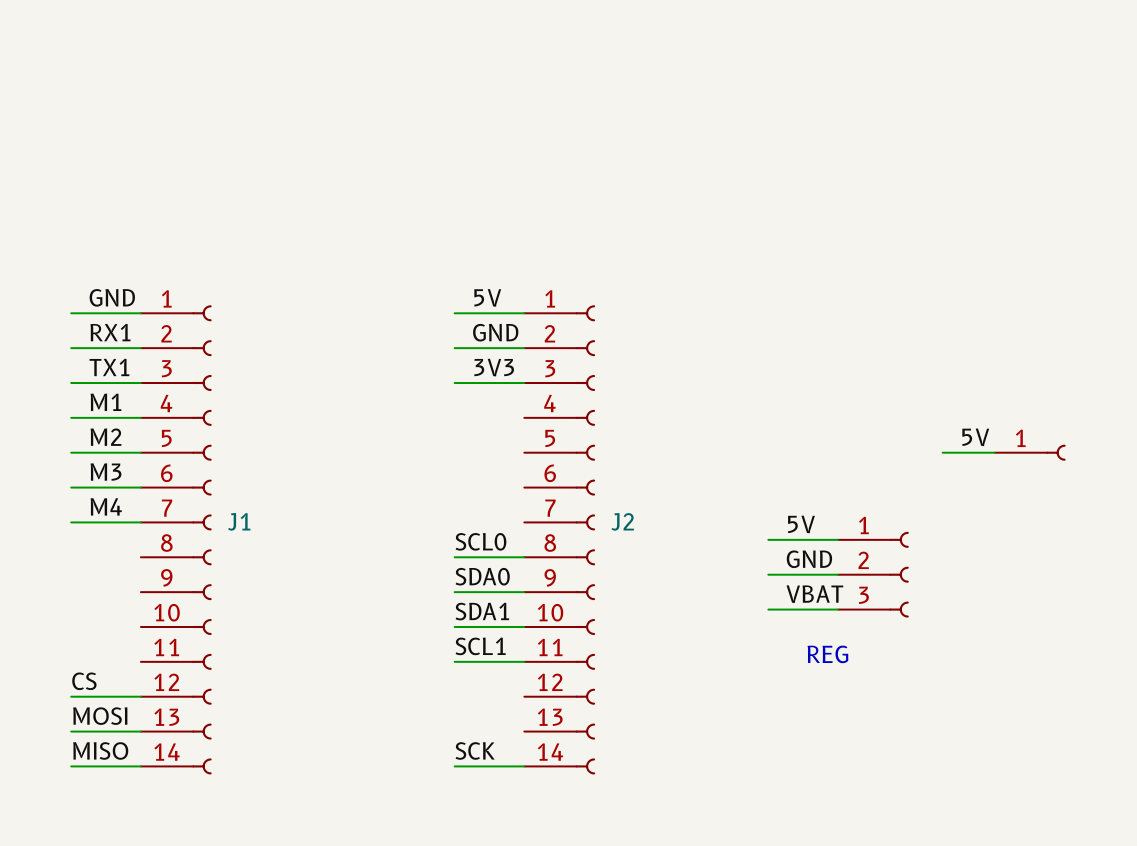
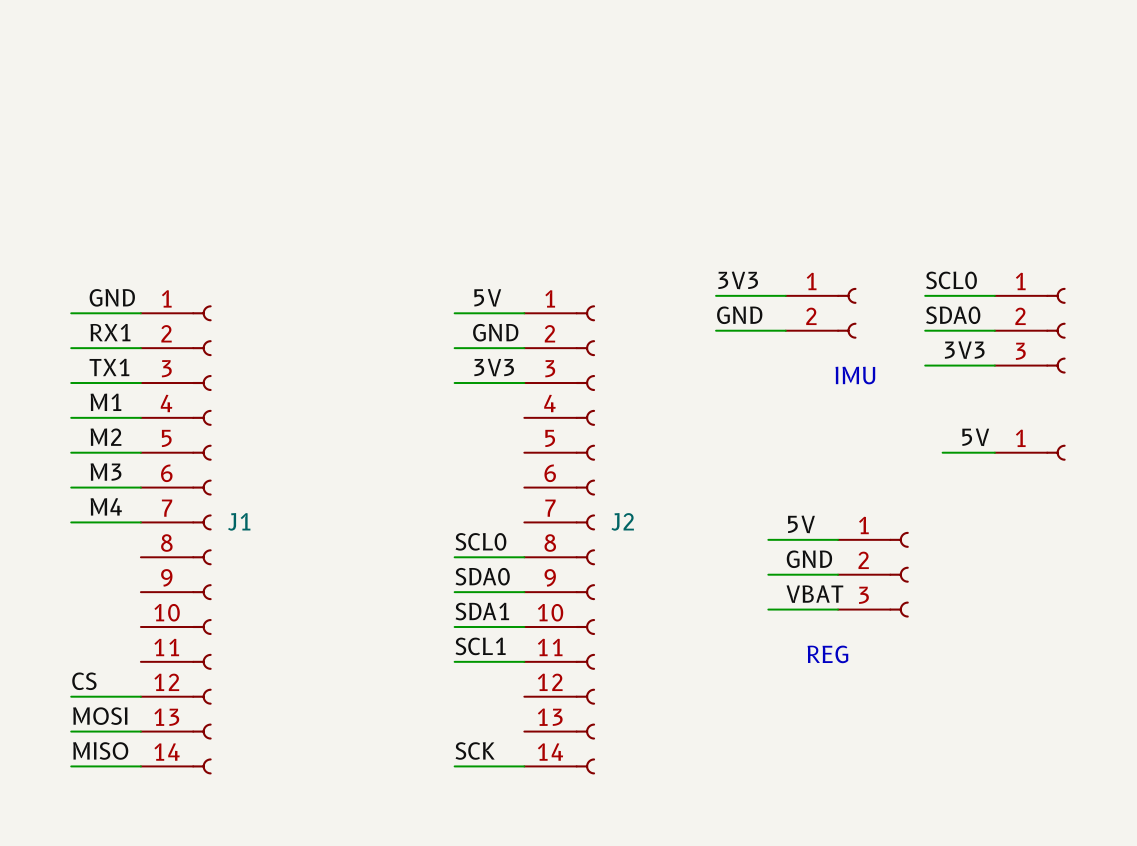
label: none -> 3V3 (738, 280)
label: none -> SCL0 (951, 280)
wire: none -> (716, 295) (785, 295)
wire: none -> (925, 295) (994, 295)
part: none -> (821, 313)
label: none -> GND (739, 315)
label: none -> SDA0 (953, 315)
wire: none -> (716, 330) (785, 330)
wire: none -> (925, 330) (994, 330)
part: none -> (1030, 330)
label: none -> 3V3 (964, 350)
wire: none -> (925, 365) (994, 365)
text: none -> IMU (855, 375)

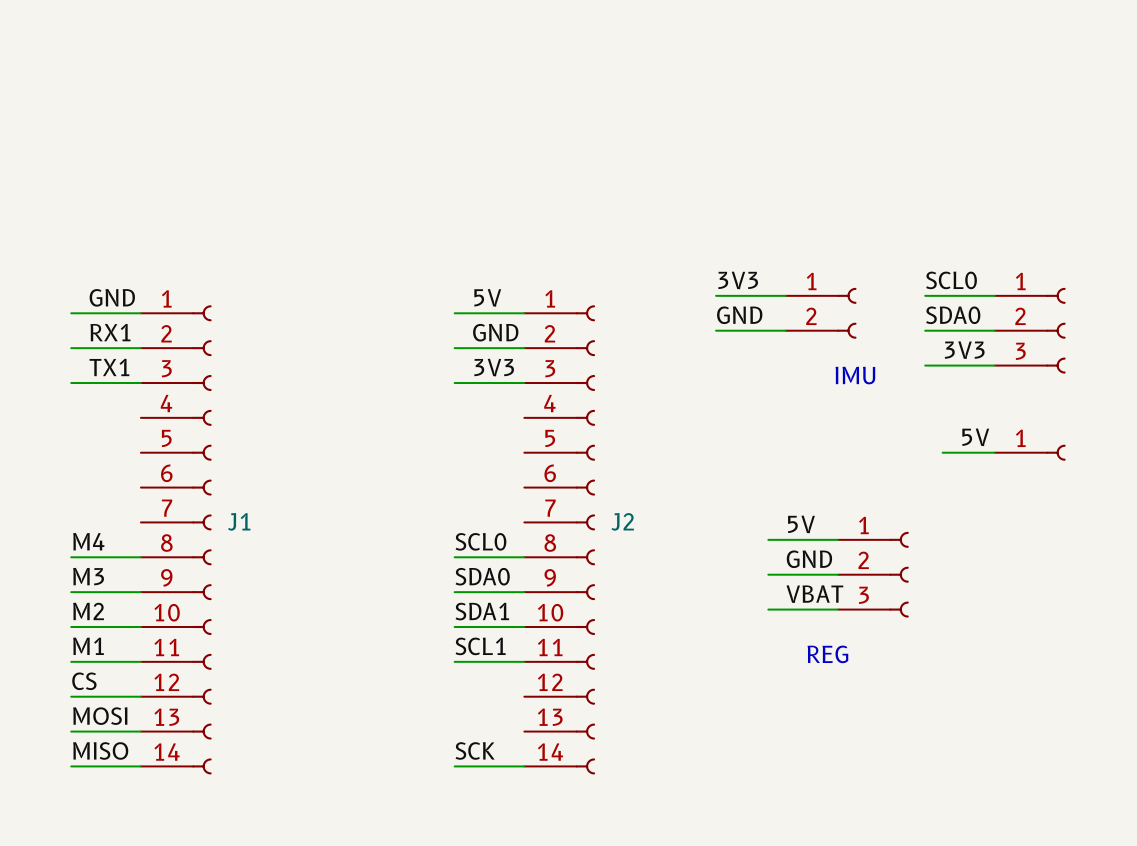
label position: M1 (105, 402) -> M1 (88, 646)
wire: (71, 417) (140, 417) -> (71, 557) (140, 557)
label position: M2 (105, 437) -> M2 (88, 611)
wire: (71, 452) (140, 452) -> (71, 592) (140, 592)
label position: M3 (106, 472) -> M3 (88, 576)
wire: (71, 487) (140, 487) -> (71, 626) (140, 626)
label position: M4 (106, 506) -> M4 (88, 541)
wire: (71, 522) (140, 522) -> (71, 661) (140, 661)

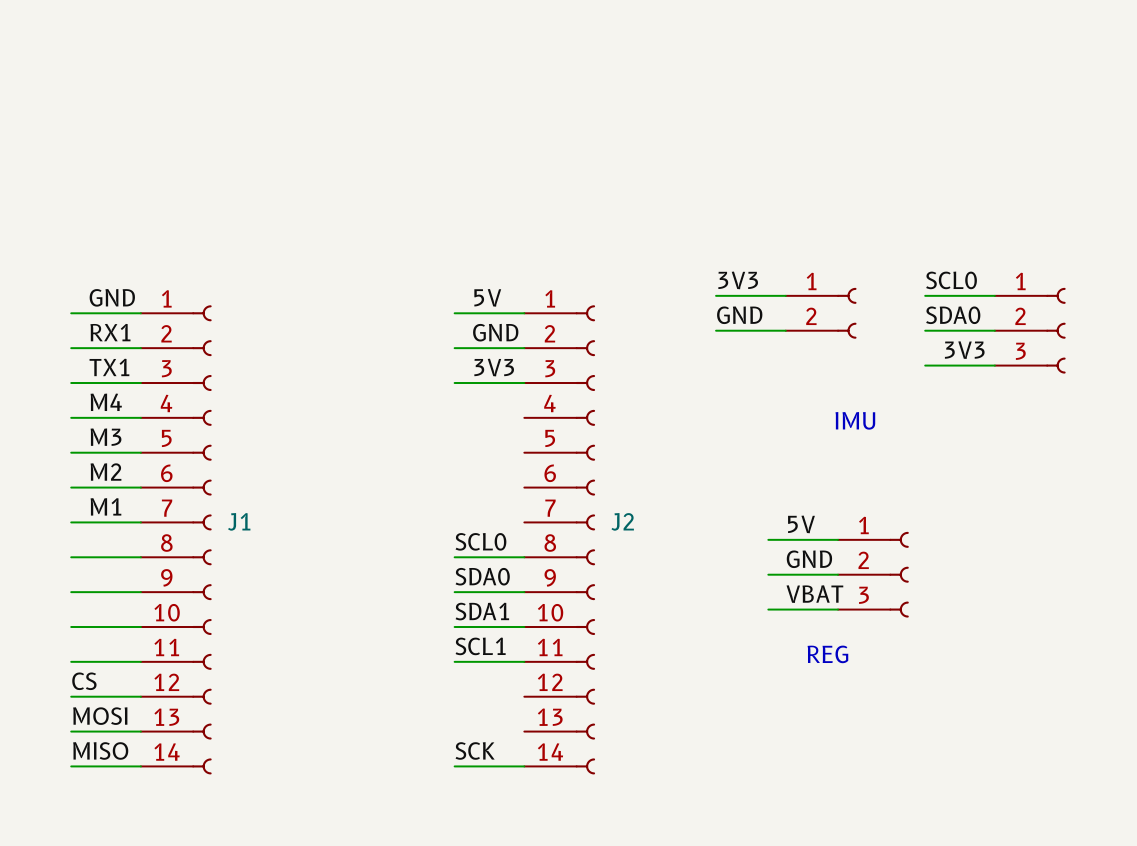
text position: IMU (855, 375) -> IMU (855, 420)
wire: none -> (71, 417) (140, 417)
label: 5V (975, 437) -> none
wire: none -> (71, 452) (140, 452)
wire: (942, 452) (994, 452) -> none
part: (1030, 452) -> none
wire: none -> (71, 487) (140, 487)
wire: none -> (71, 522) (140, 522)
label position: M4 (88, 541) -> M4 (106, 402)
label position: M3 (88, 576) -> M3 (106, 437)
label position: M2 (88, 611) -> M2 (105, 472)
label position: M1 (88, 646) -> M1 (105, 506)

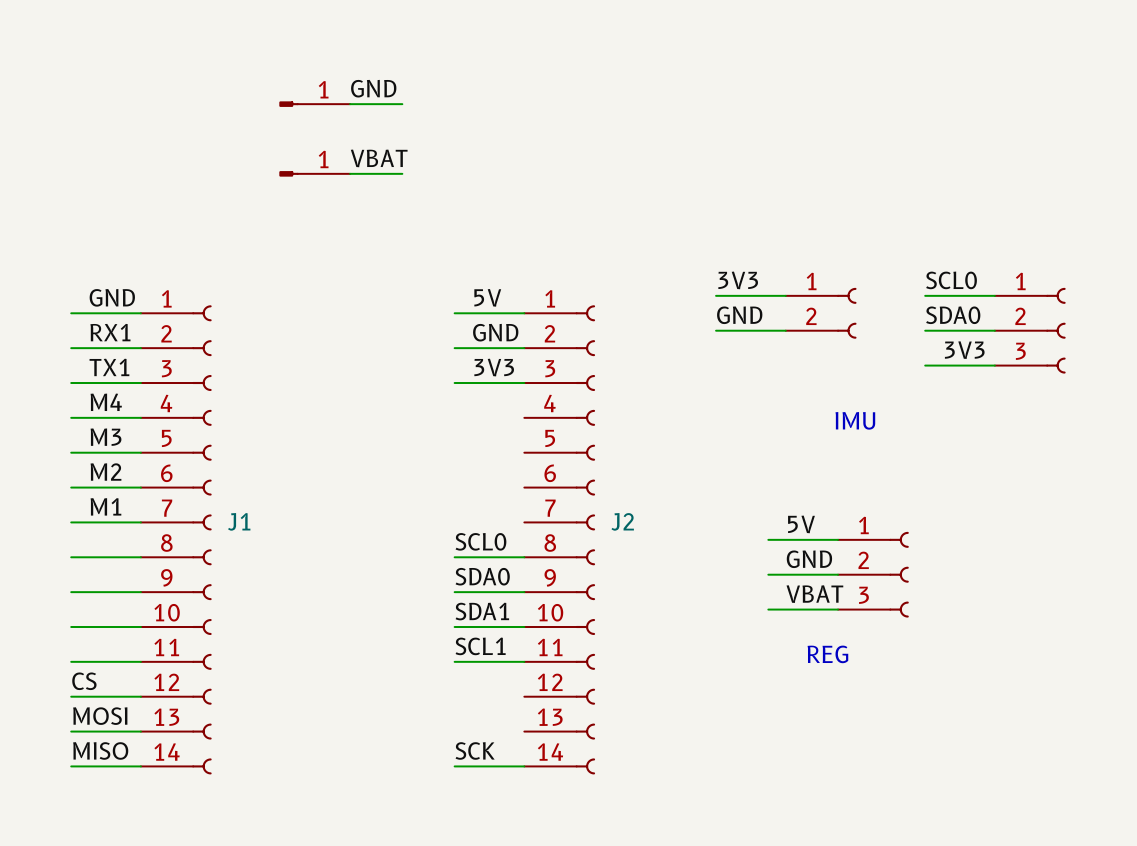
label: none -> GND (373, 88)
part: none -> (314, 104)
wire: none -> (350, 104) (402, 104)
label: none -> VBAT (379, 158)
part: none -> (314, 173)
wire: none -> (350, 173) (402, 173)

